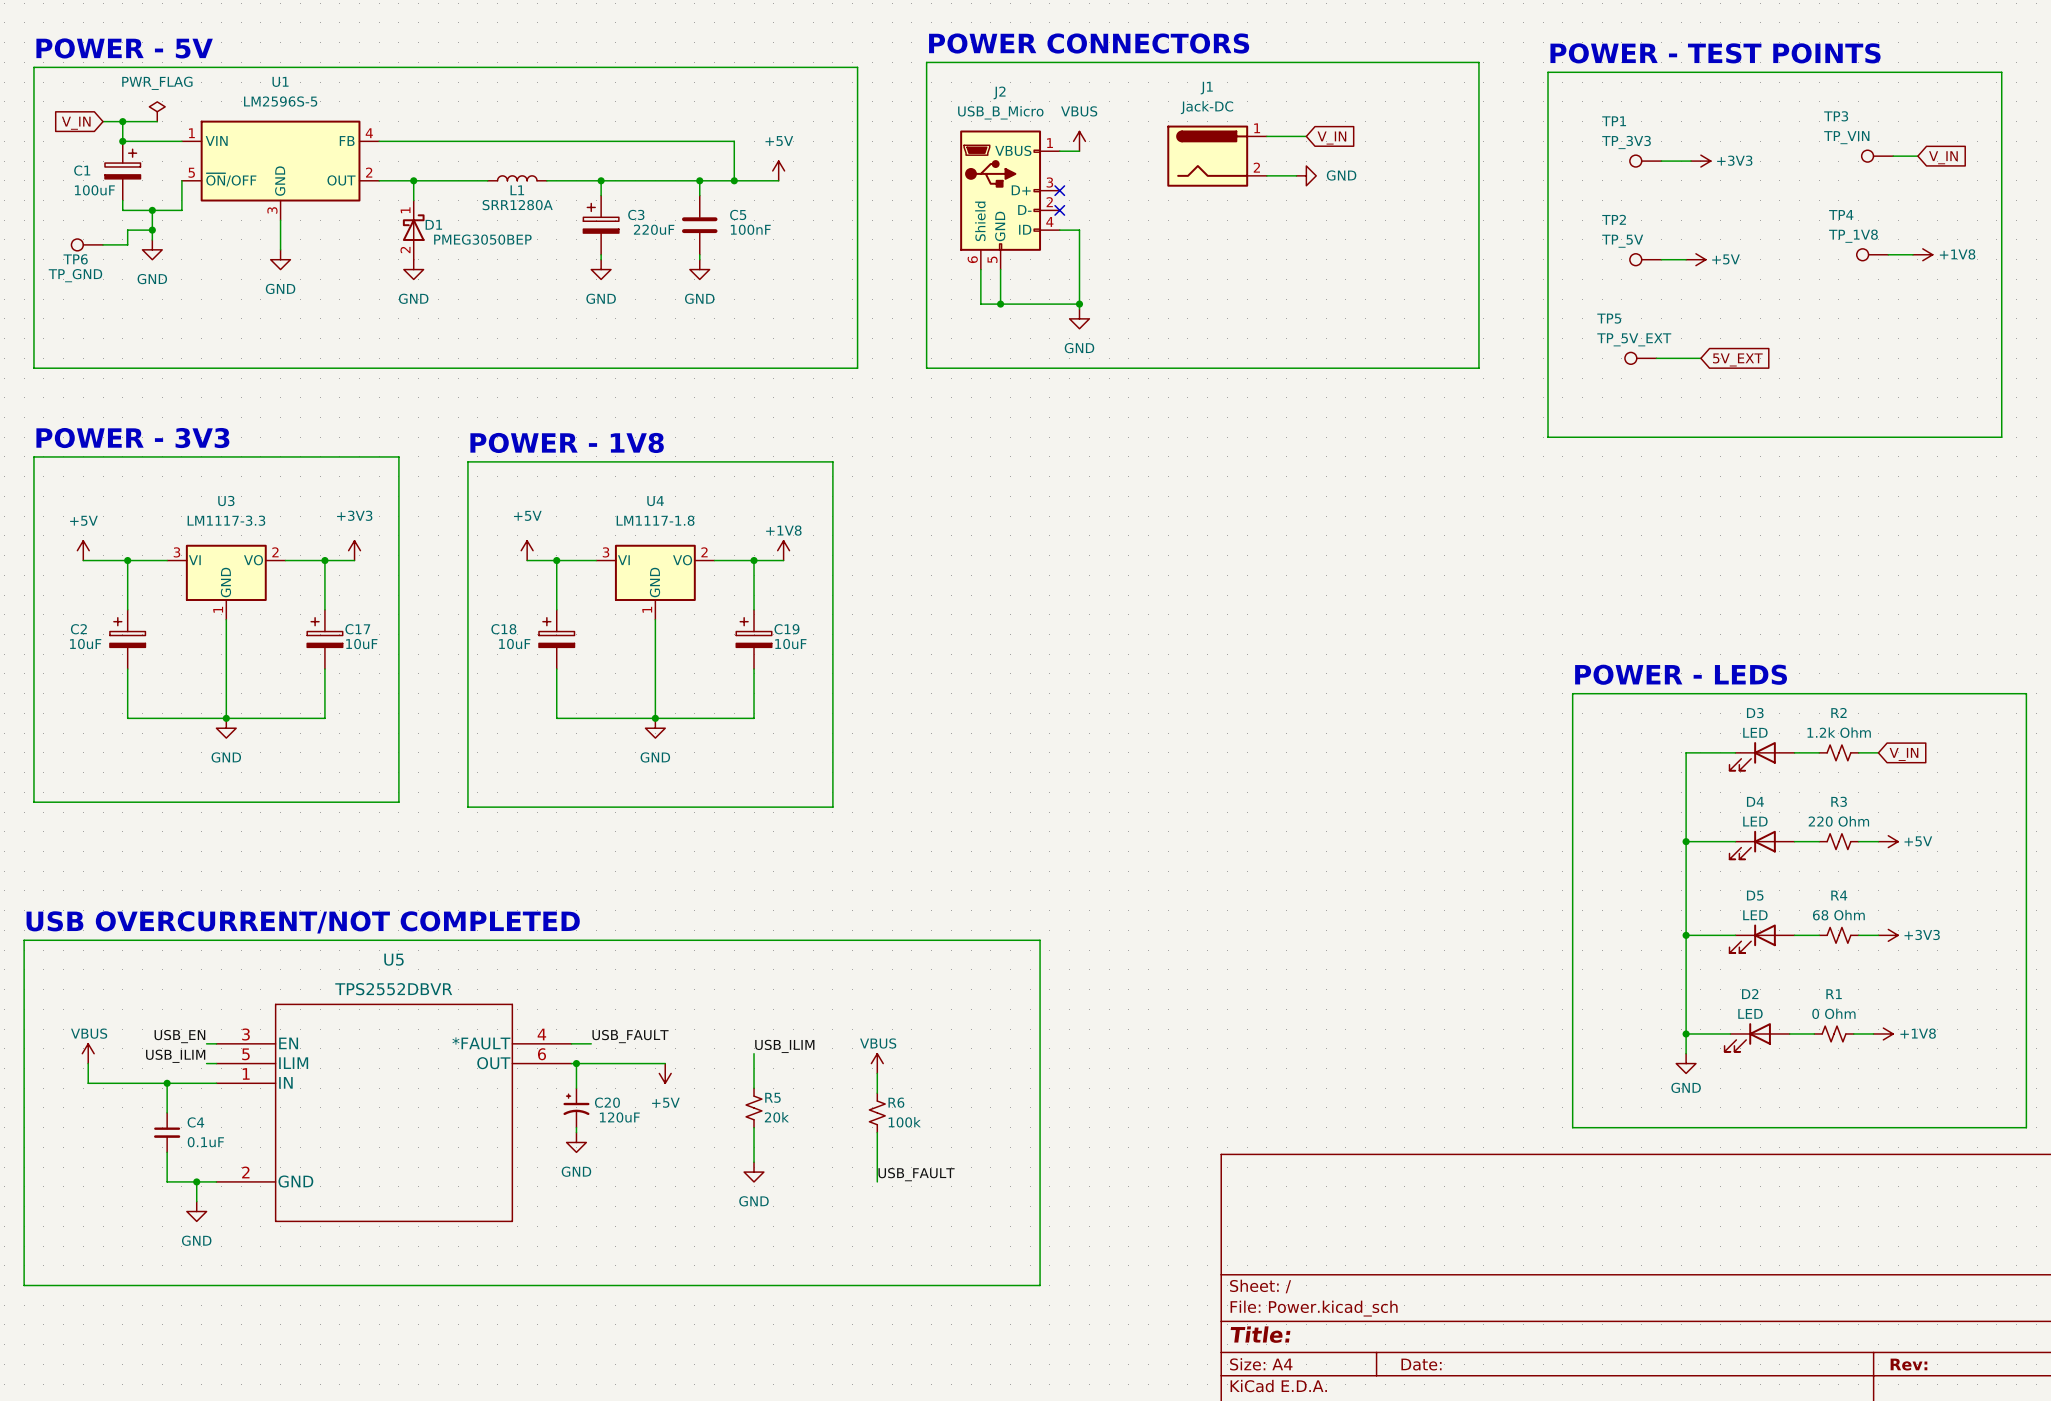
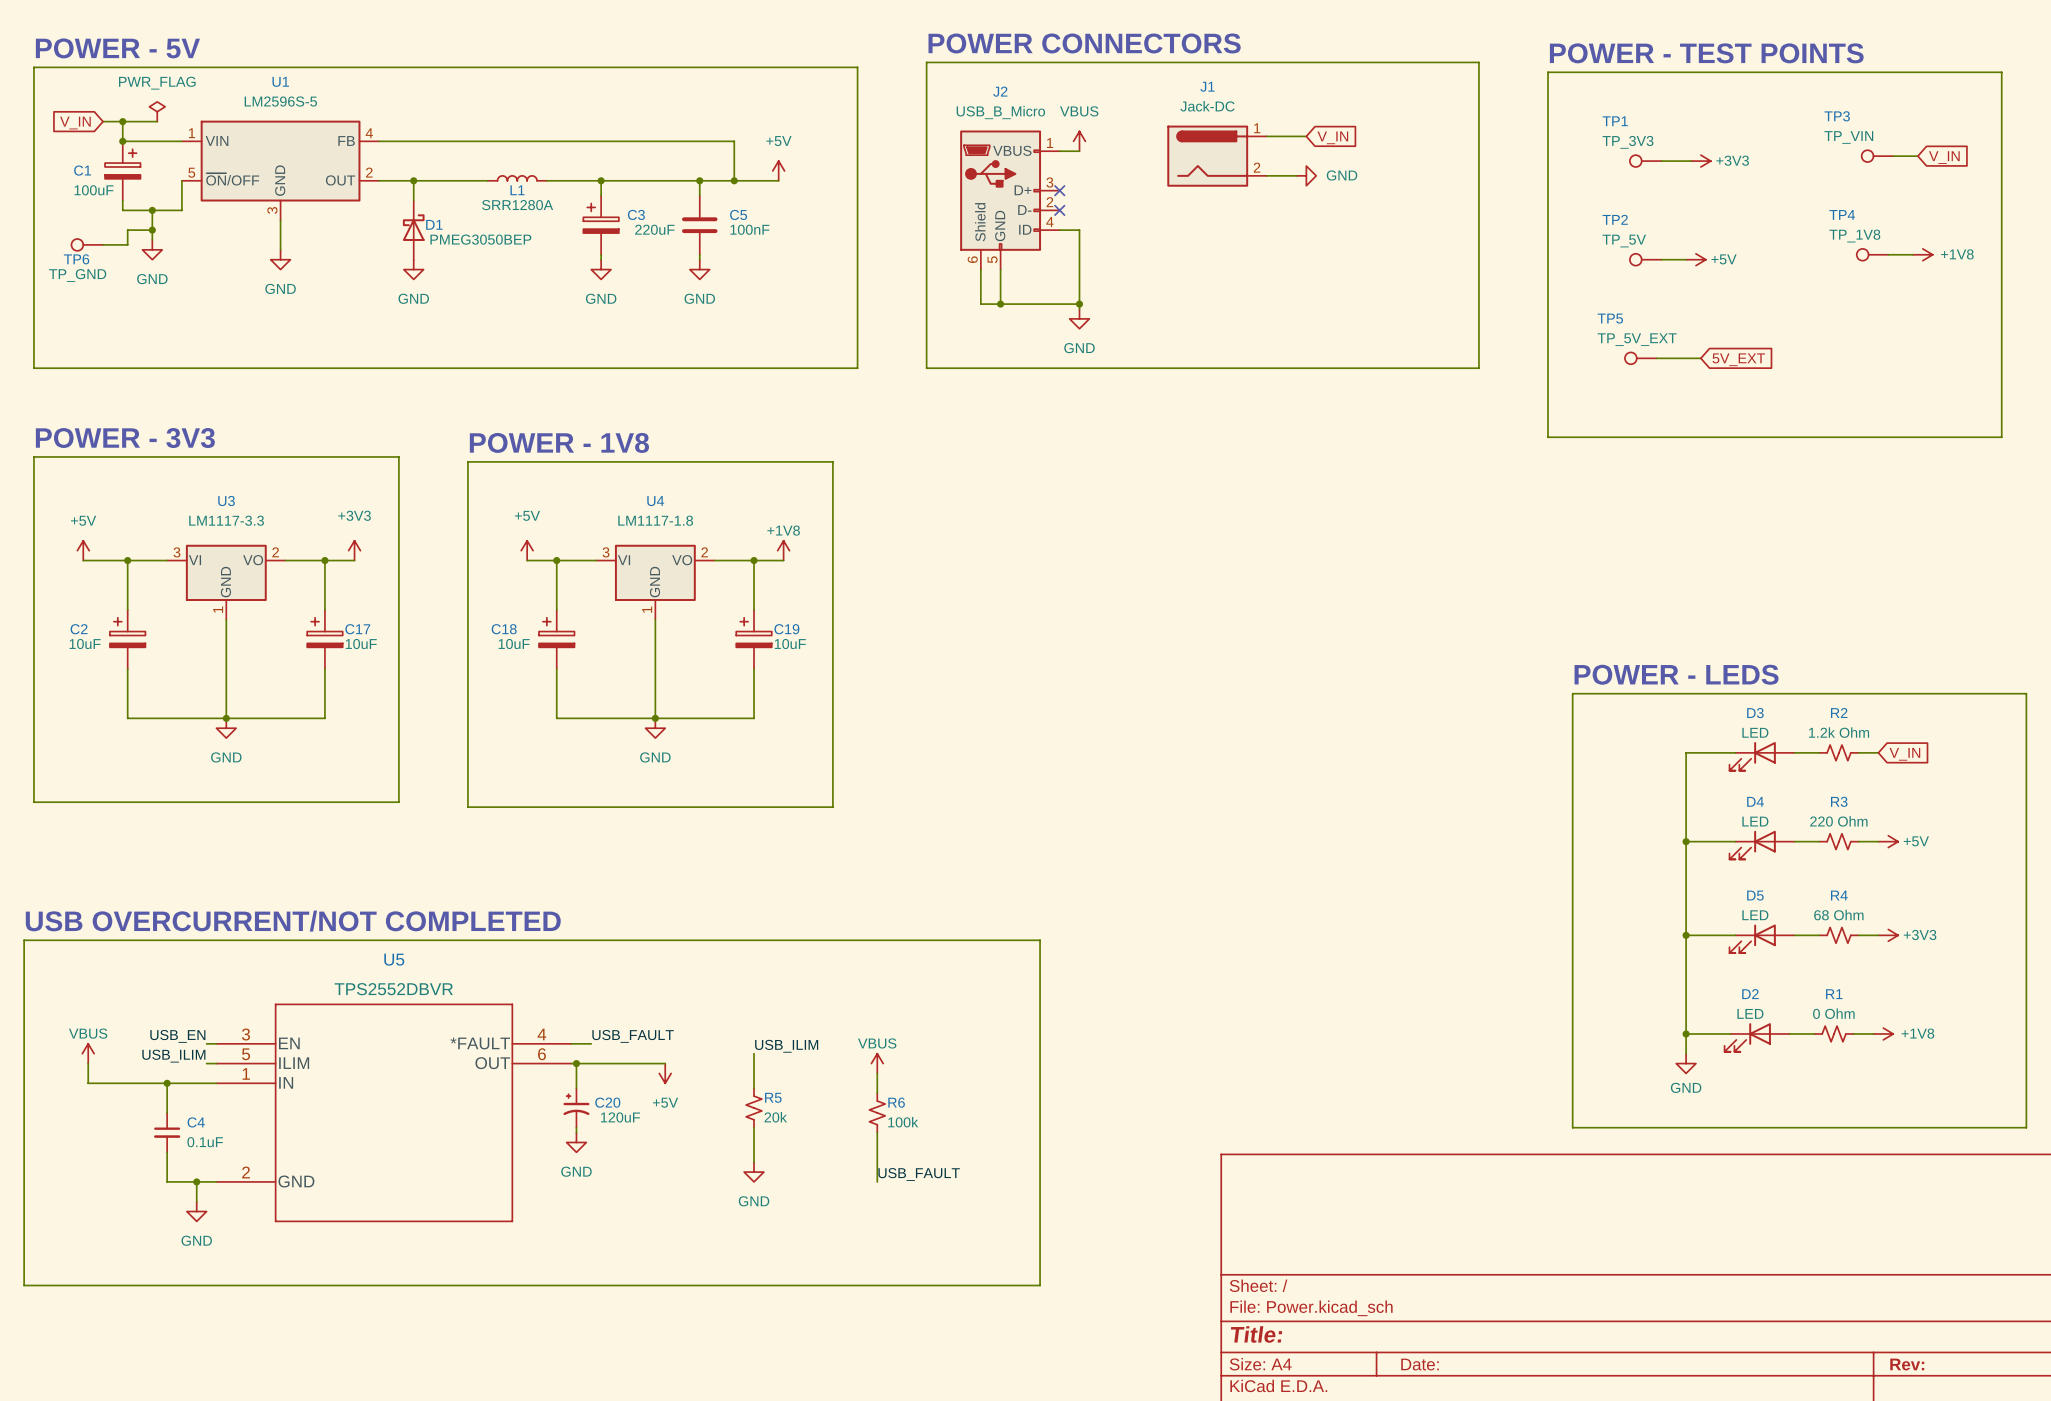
D1 pin number: 1 (405, 210) -> none
D1 pin number: 2 (405, 250) -> none

